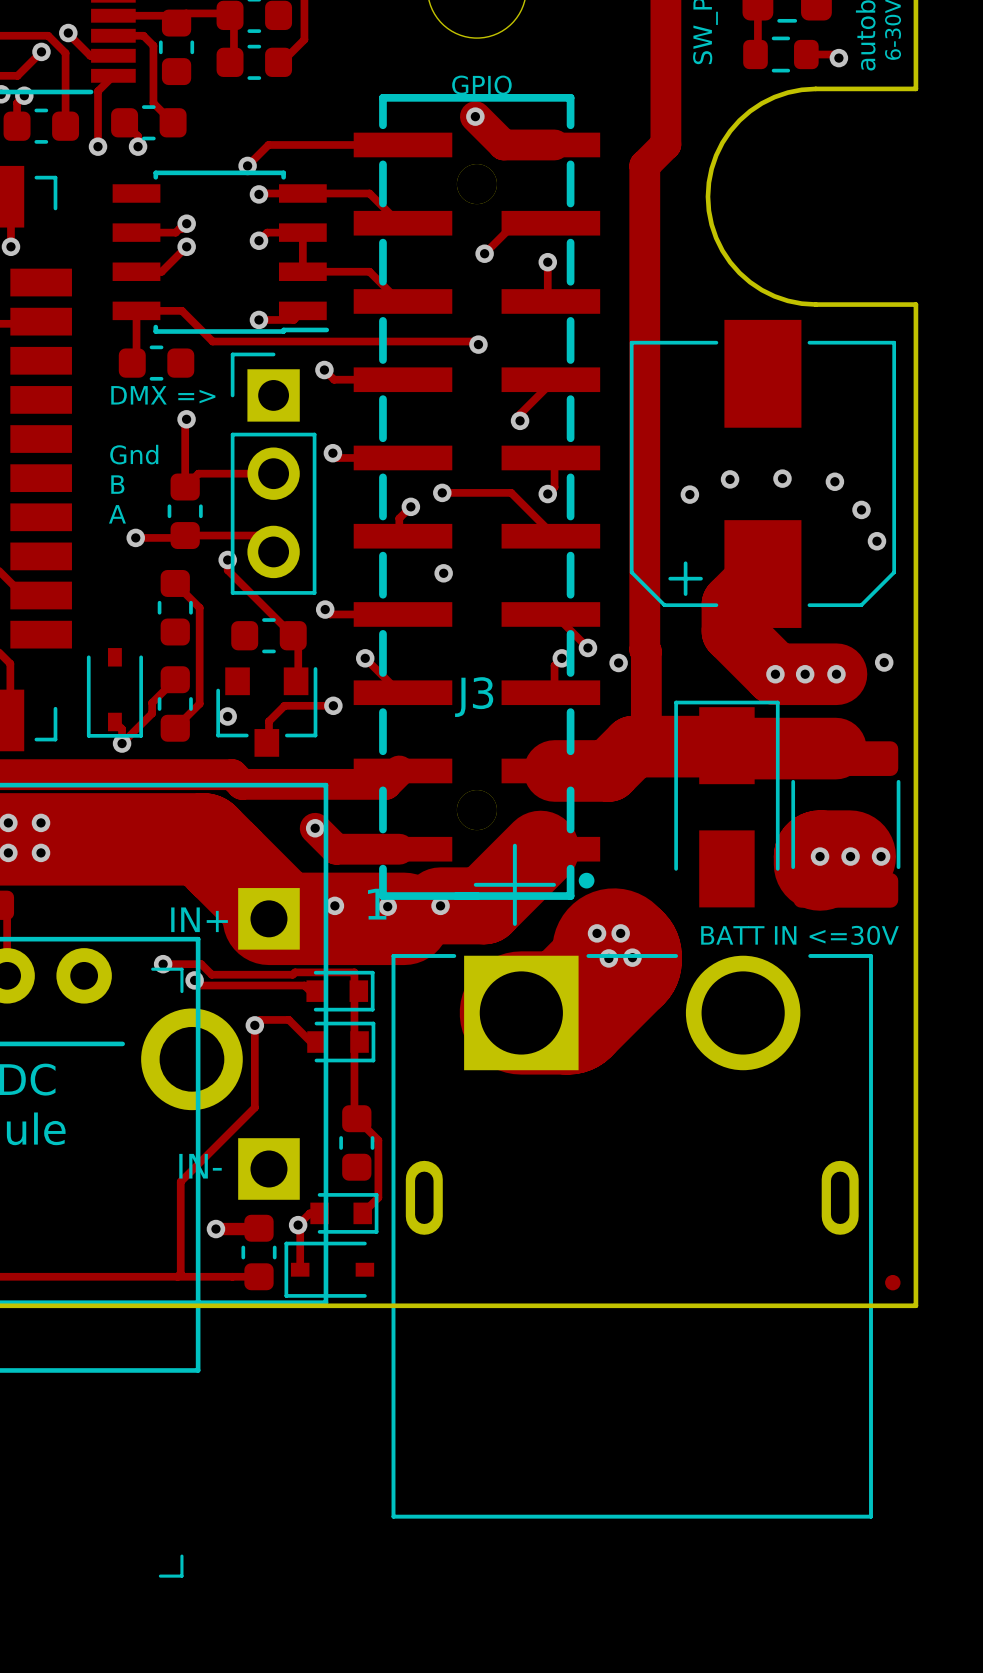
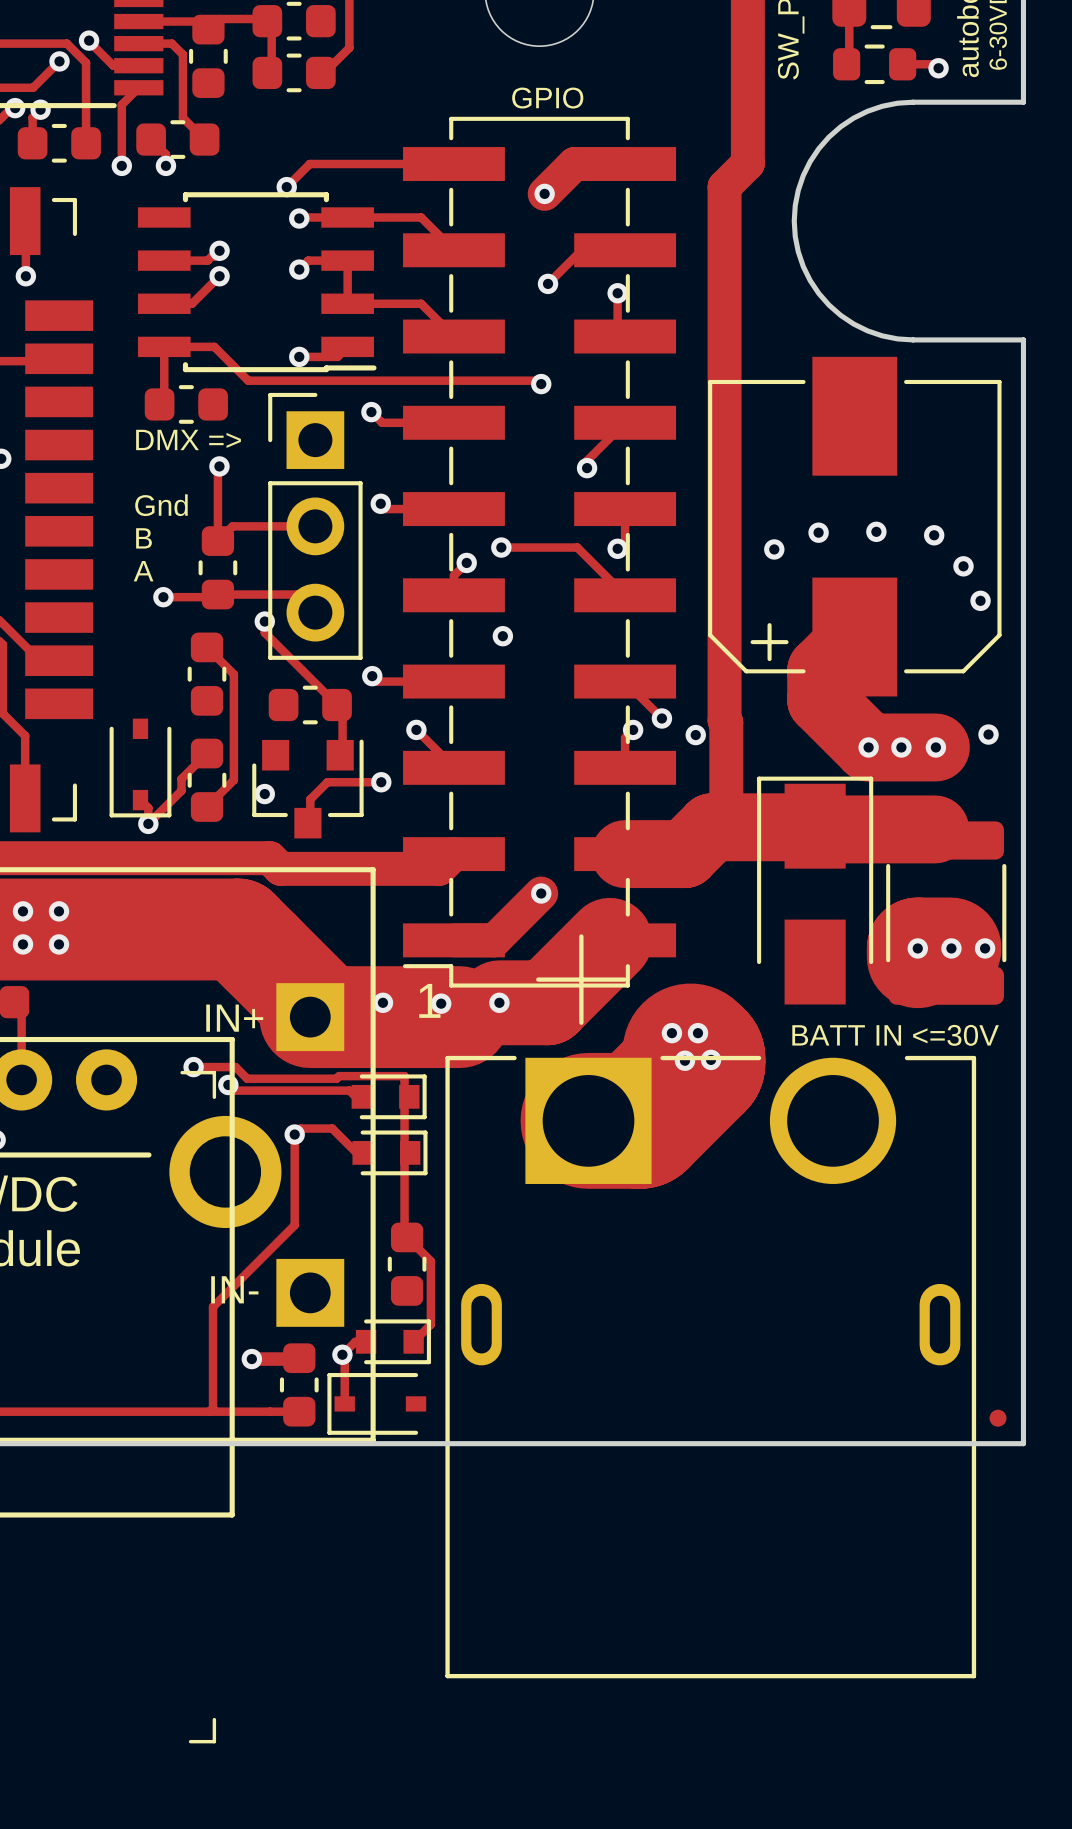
track: (475, 116) (503, 144) (508, 144) -> (544, 193) (574, 164)
via position: (475, 116) -> (544, 193)
J3: (476, 496) -> none
part: none -> (539, 552)
track: (315, 828) (336, 849) (399, 849) -> (541, 893) (494, 940) (453, 940)
via position: (315, 828) -> (541, 893)

